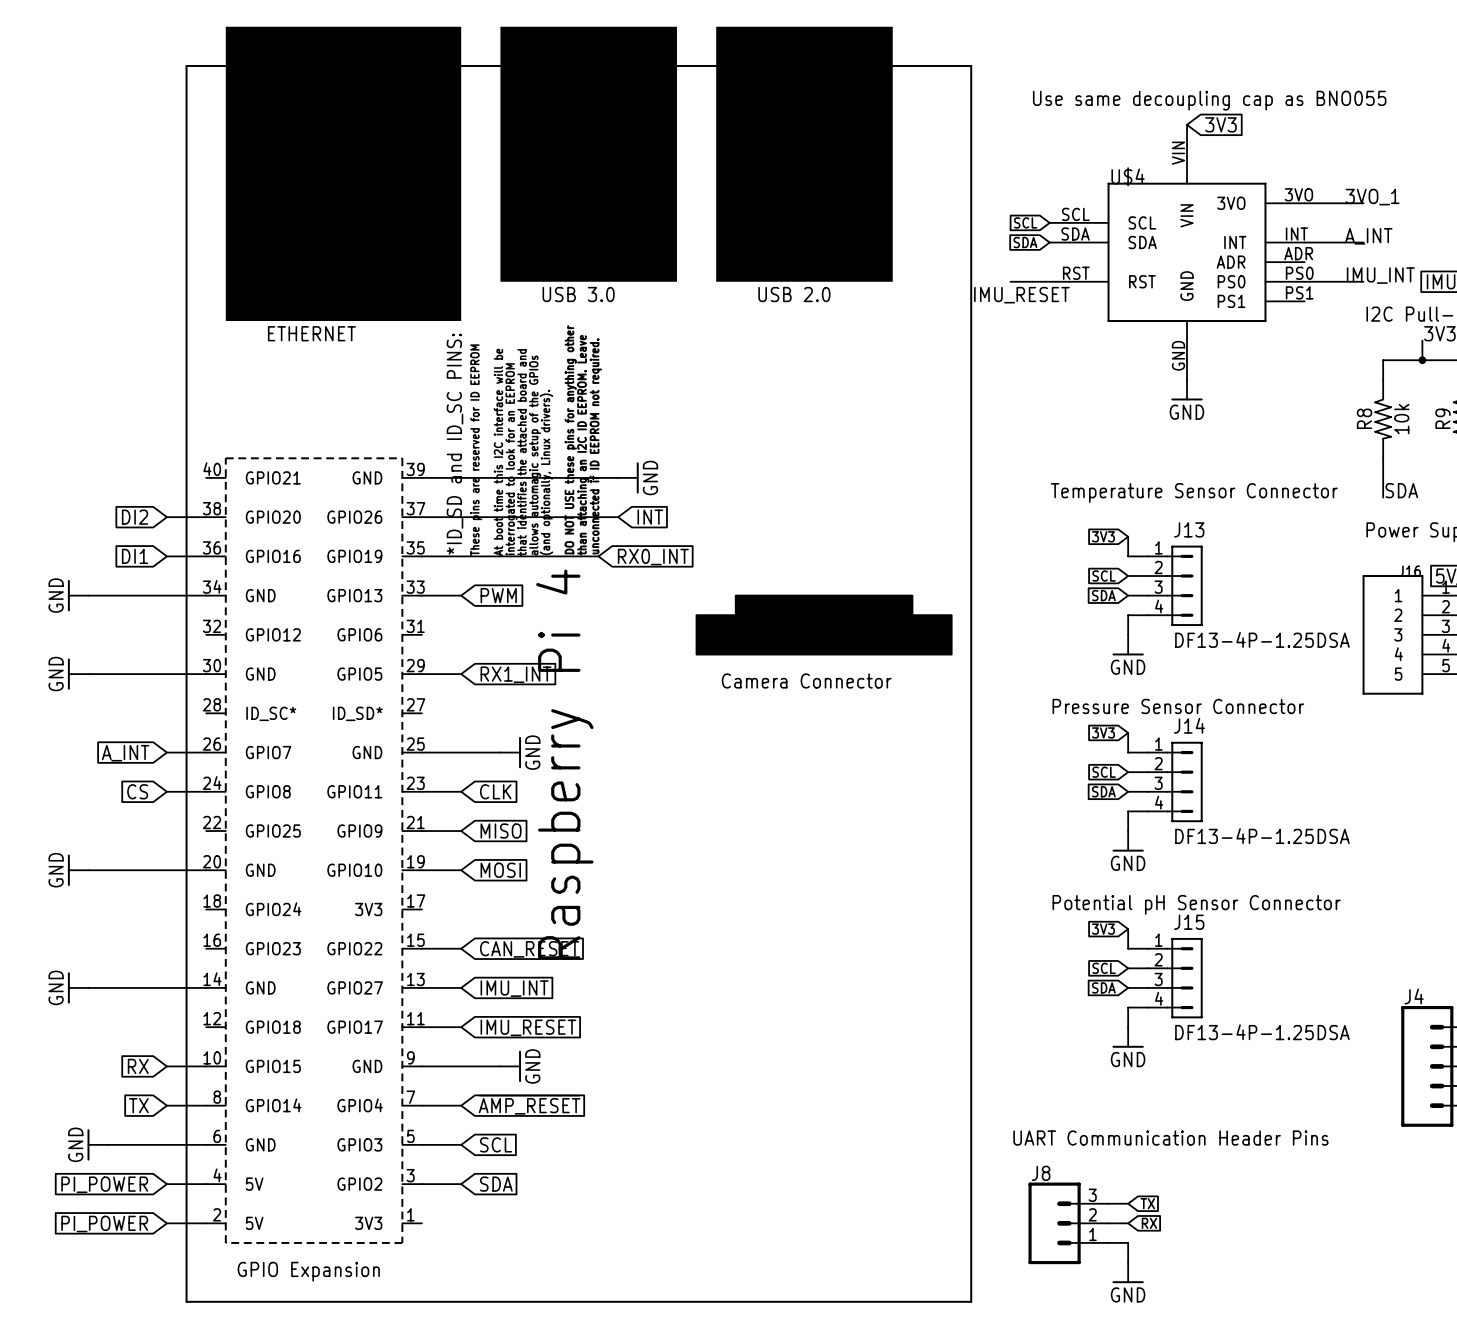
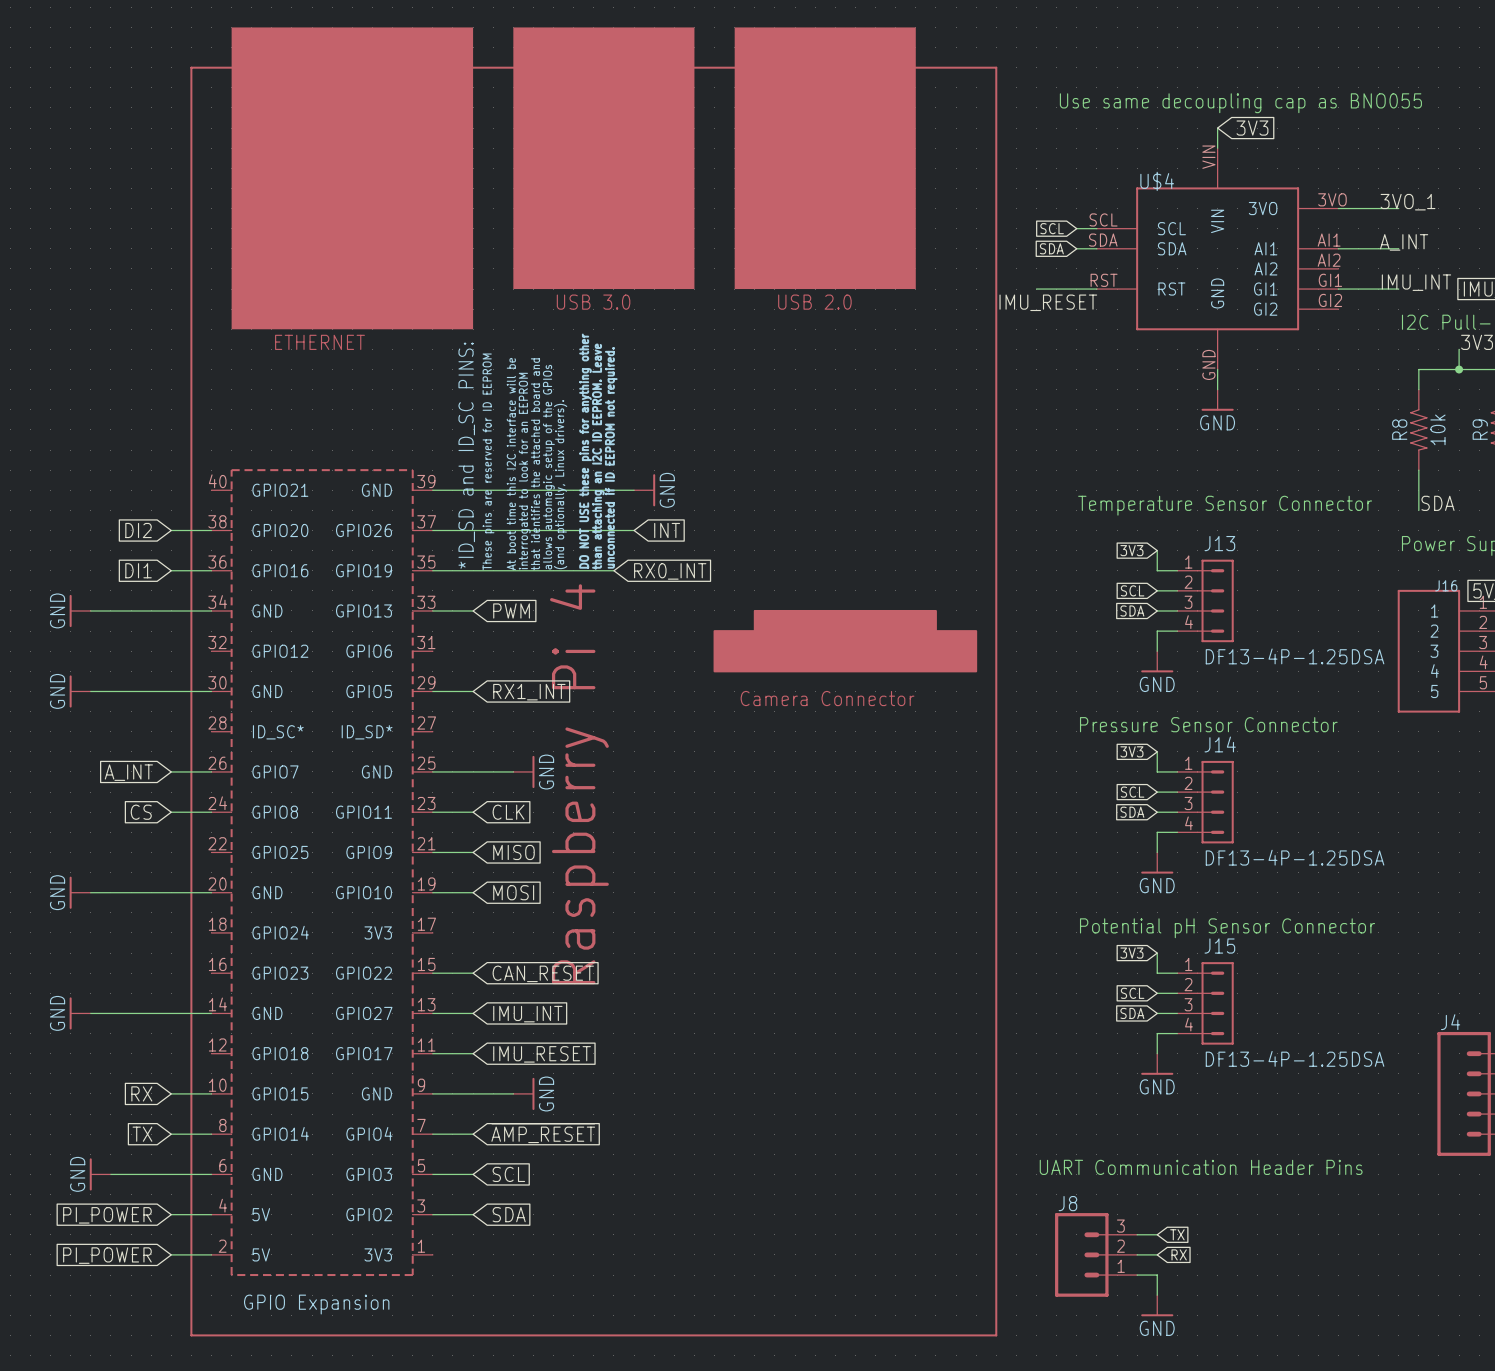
U$4 pin number: INT (1296, 234) -> AI1 (1329, 240)
U$4 pin name: INT (1235, 242) -> AI1 (1265, 248)
U$4 pin number: ADR (1298, 253) -> AI2 (1329, 260)
U$4 pin name: ADR (1231, 262) -> AI2 (1265, 268)
U$4 pin number: PS0 (1299, 273) -> GI1 (1330, 280)
U$4 pin name: PS0 (1231, 281) -> GI1 (1265, 289)
U$4 pin number: PS1 (1299, 292) -> GI2 (1330, 300)
U$4 pin name: PS1 (1231, 301) -> GI2 (1265, 309)

